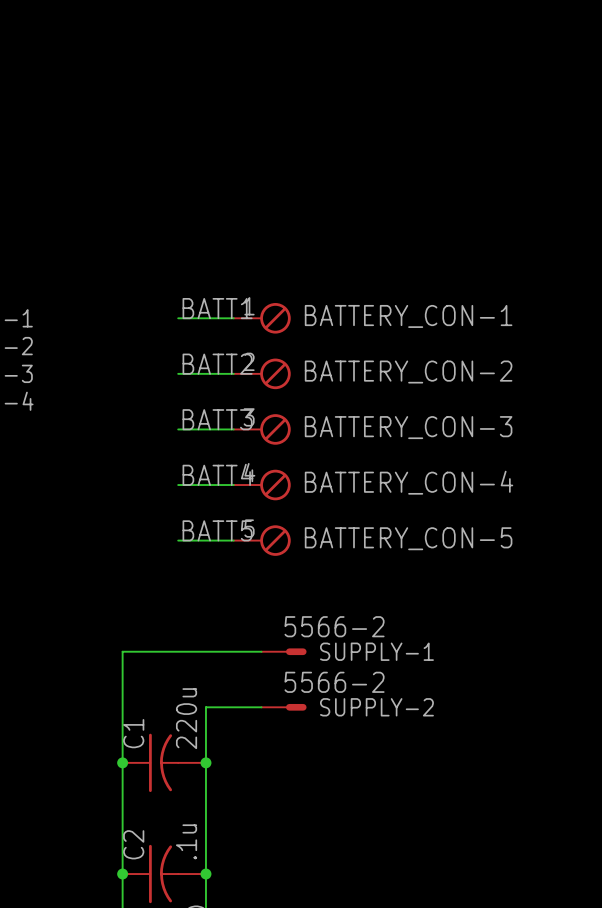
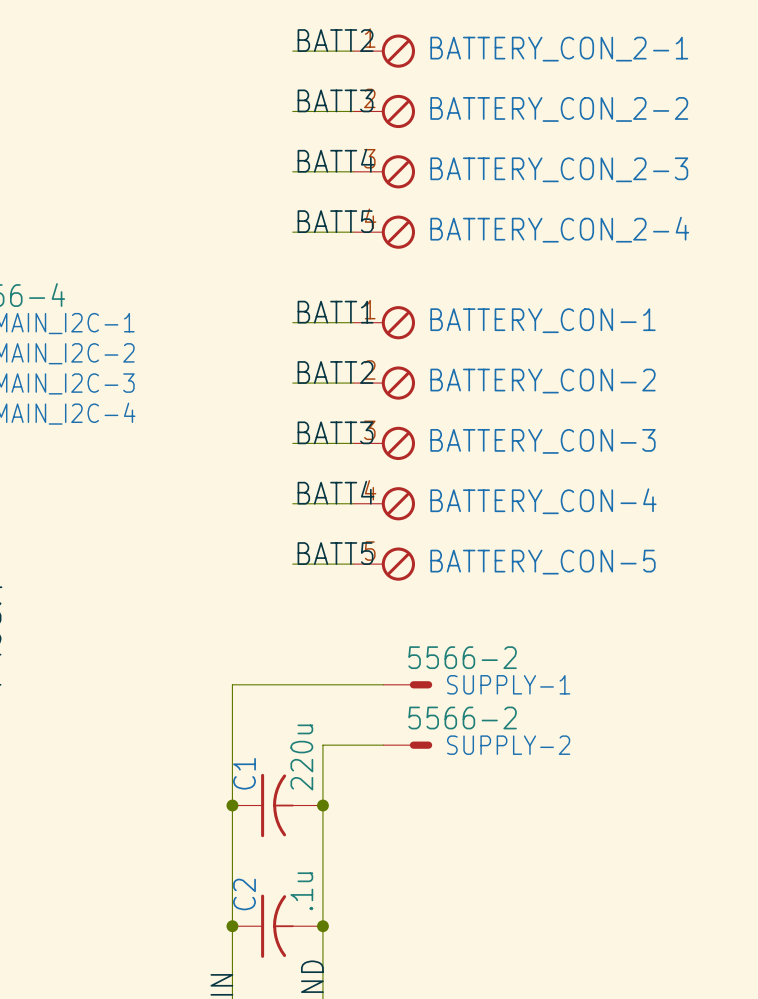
label: none -> BATT2 (335, 40)
wire: none -> (292, 51) (353, 51)
BATTERY_CON_2-1: none -> (384, 51)
label: none -> BATT3 (335, 100)
wire: none -> (292, 111) (353, 111)
BATTERY_CON_2-2: none -> (384, 111)
label: none -> BATT4 (335, 160)
wire: none -> (292, 171) (353, 171)
BATTERY_CON_2-3: none -> (384, 171)
label: none -> BATT5 (335, 221)
wire: none -> (292, 232) (353, 232)
BATTERY_CON_2-4: none -> (384, 232)

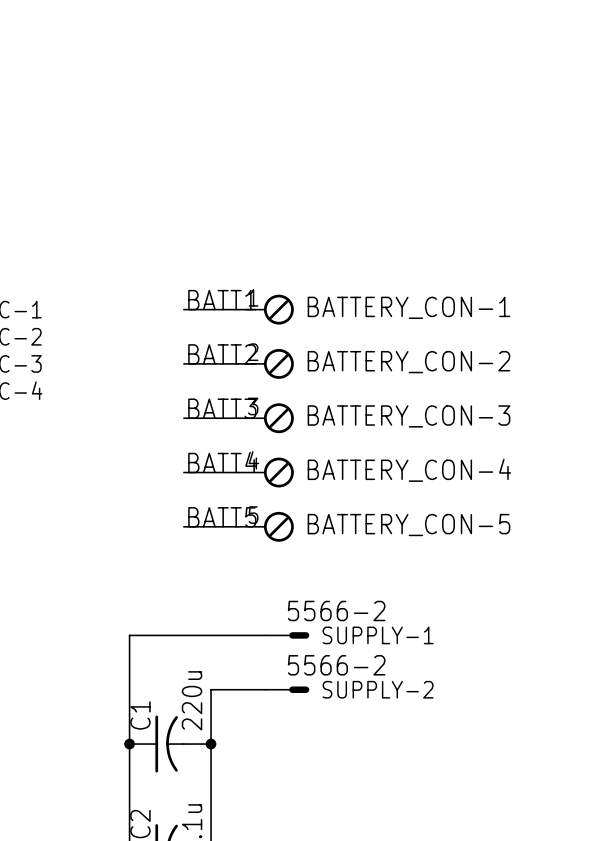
label: BATT2 (335, 40) -> none
wire: (292, 51) (353, 51) -> none
BATTERY_CON_2-1: (384, 51) -> none
label: BATT3 (335, 100) -> none
wire: (292, 111) (353, 111) -> none
BATTERY_CON_2-2: (384, 111) -> none
label: BATT4 (335, 160) -> none
wire: (292, 171) (353, 171) -> none
BATTERY_CON_2-3: (384, 171) -> none
label: BATT5 (335, 221) -> none
wire: (292, 232) (353, 232) -> none
BATTERY_CON_2-4: (384, 232) -> none

